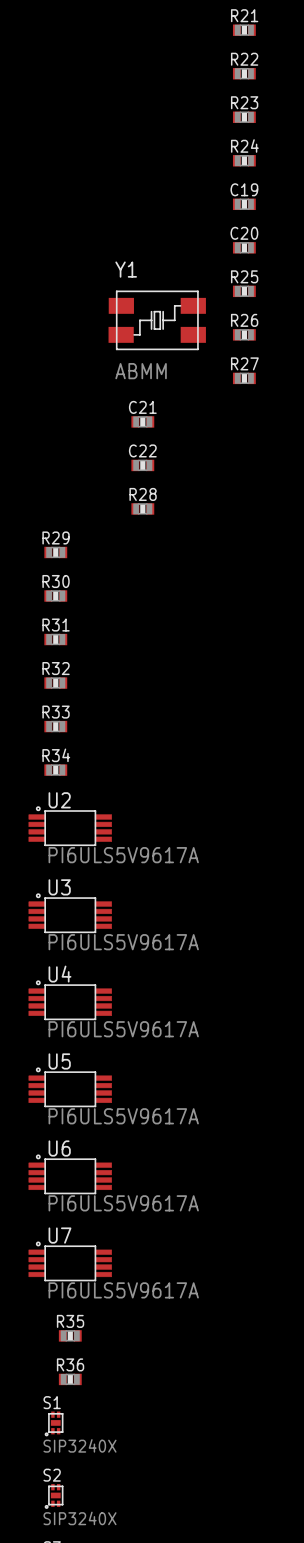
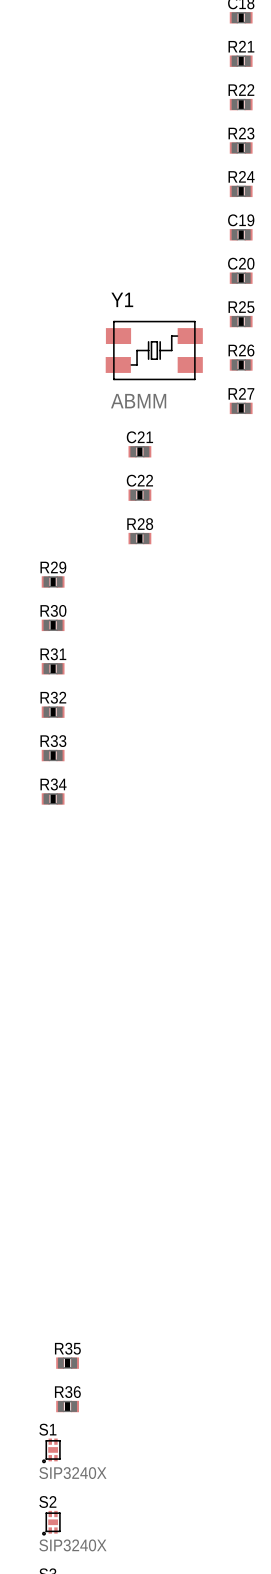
U2: PI6ULS5V9617A (70, 826) -> none
U3: PI6ULS5V9617A (70, 913) -> none
U4: PI6ULS5V9617A (70, 1000) -> none
U5: PI6ULS5V9617A (70, 1087) -> none
U6: PI6ULS5V9617A (70, 1174) -> none
U7: PI6ULS5V9617A (70, 1261) -> none

